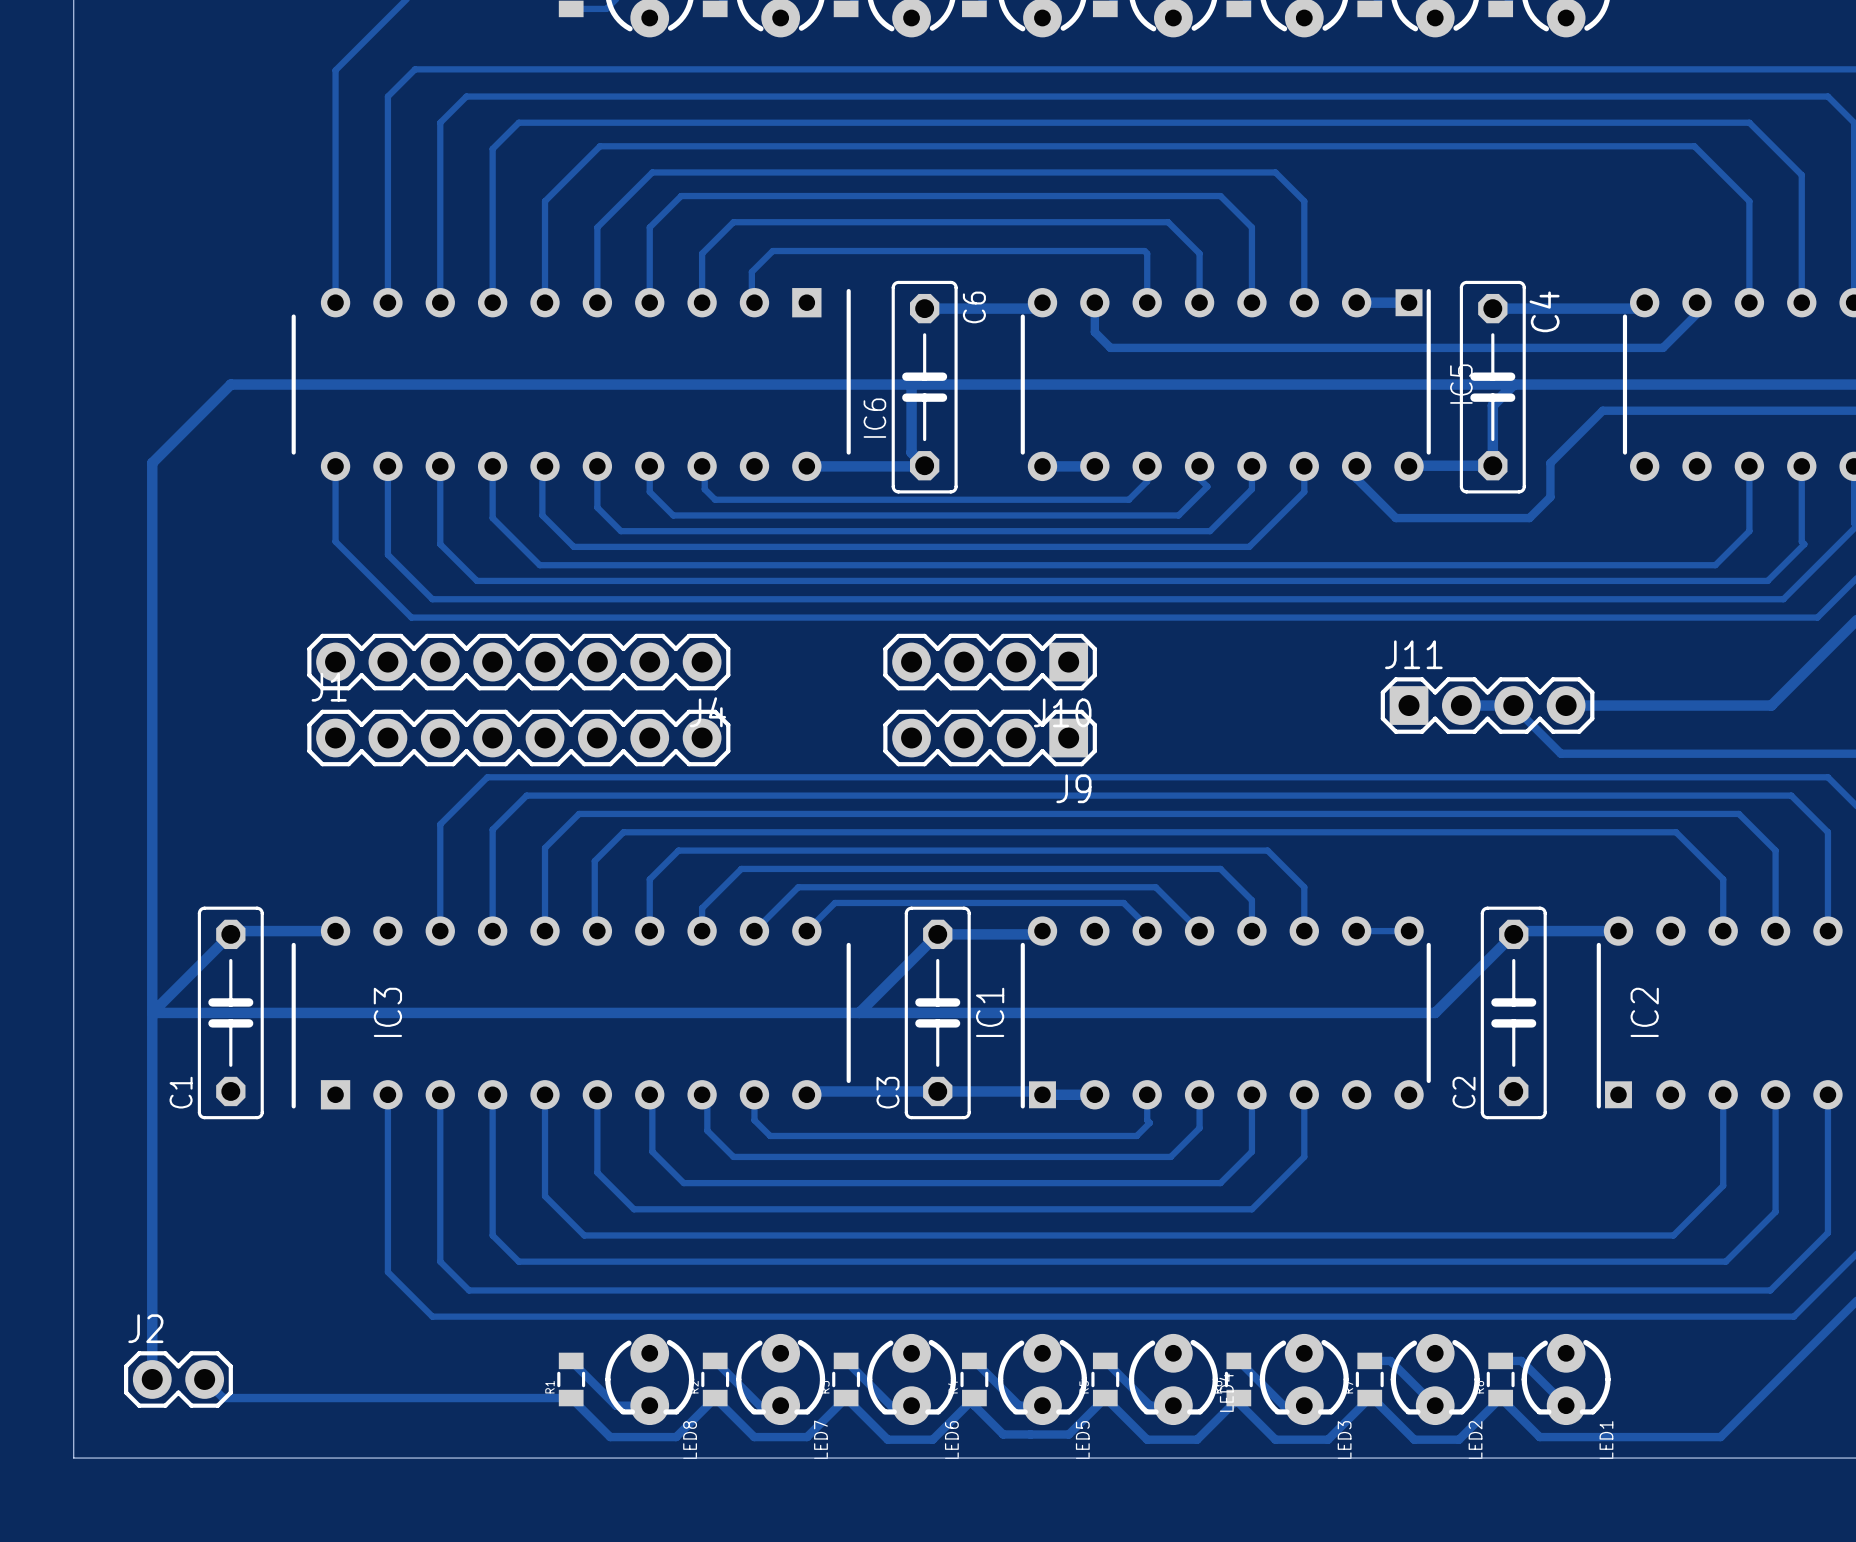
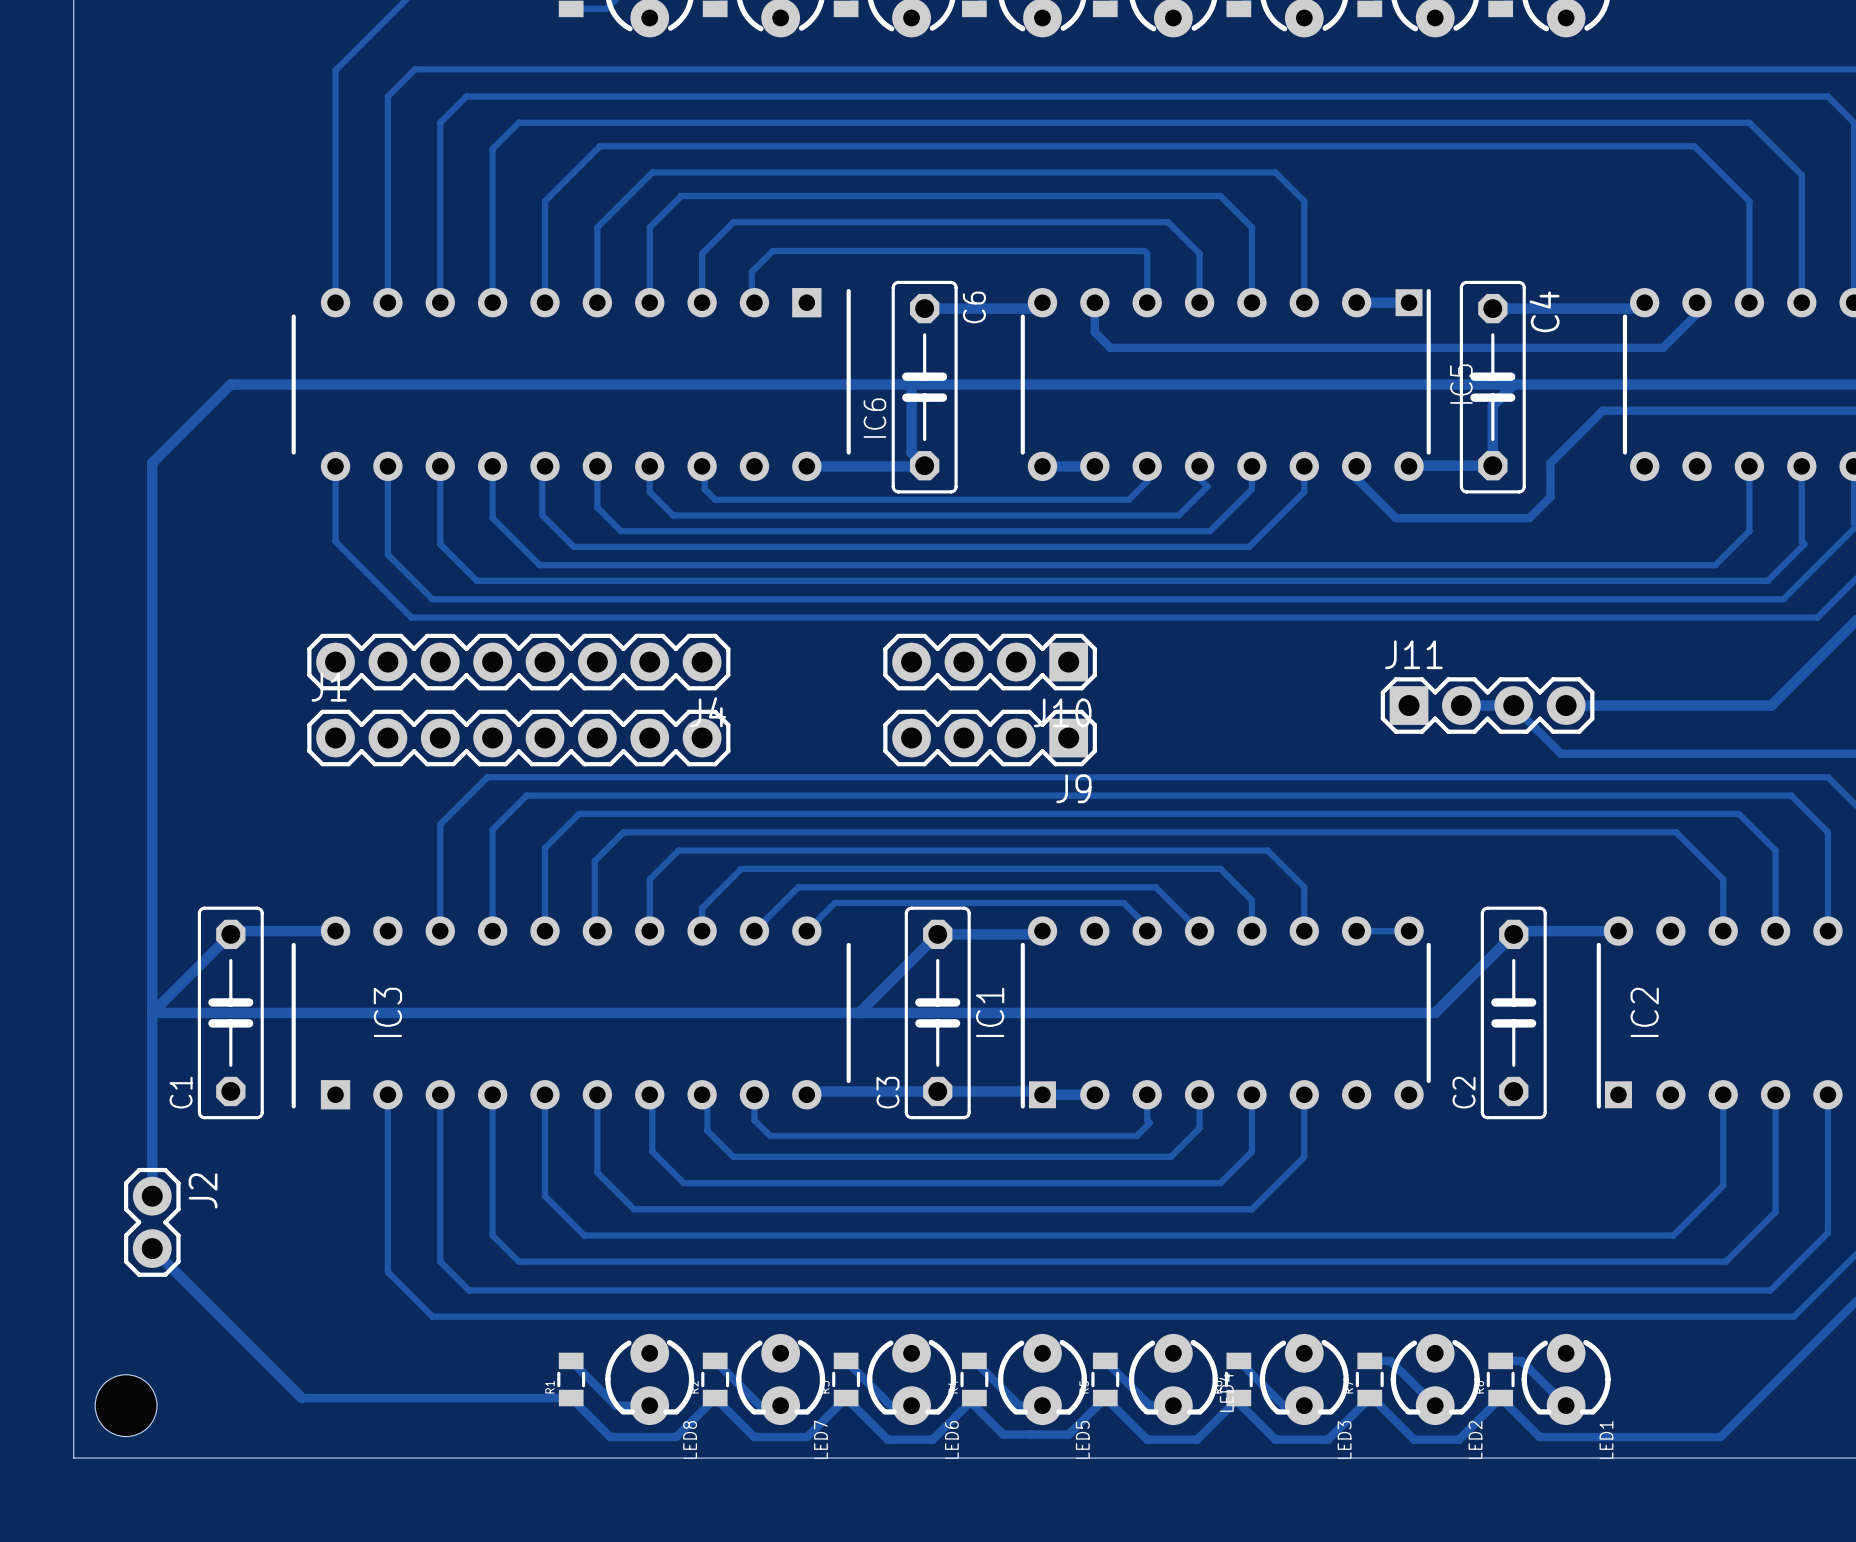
track: (152, 1196) (152, 1379) -> none
J2 rotation: 0° (178, 1379) -> 90° clockwise (152, 1222)
J2 position: (178, 1379) -> (152, 1222)
track: (204, 1379) (223, 1398) (301, 1398) -> (152, 1248) (301, 1398)
hole: none -> (126, 1405)

